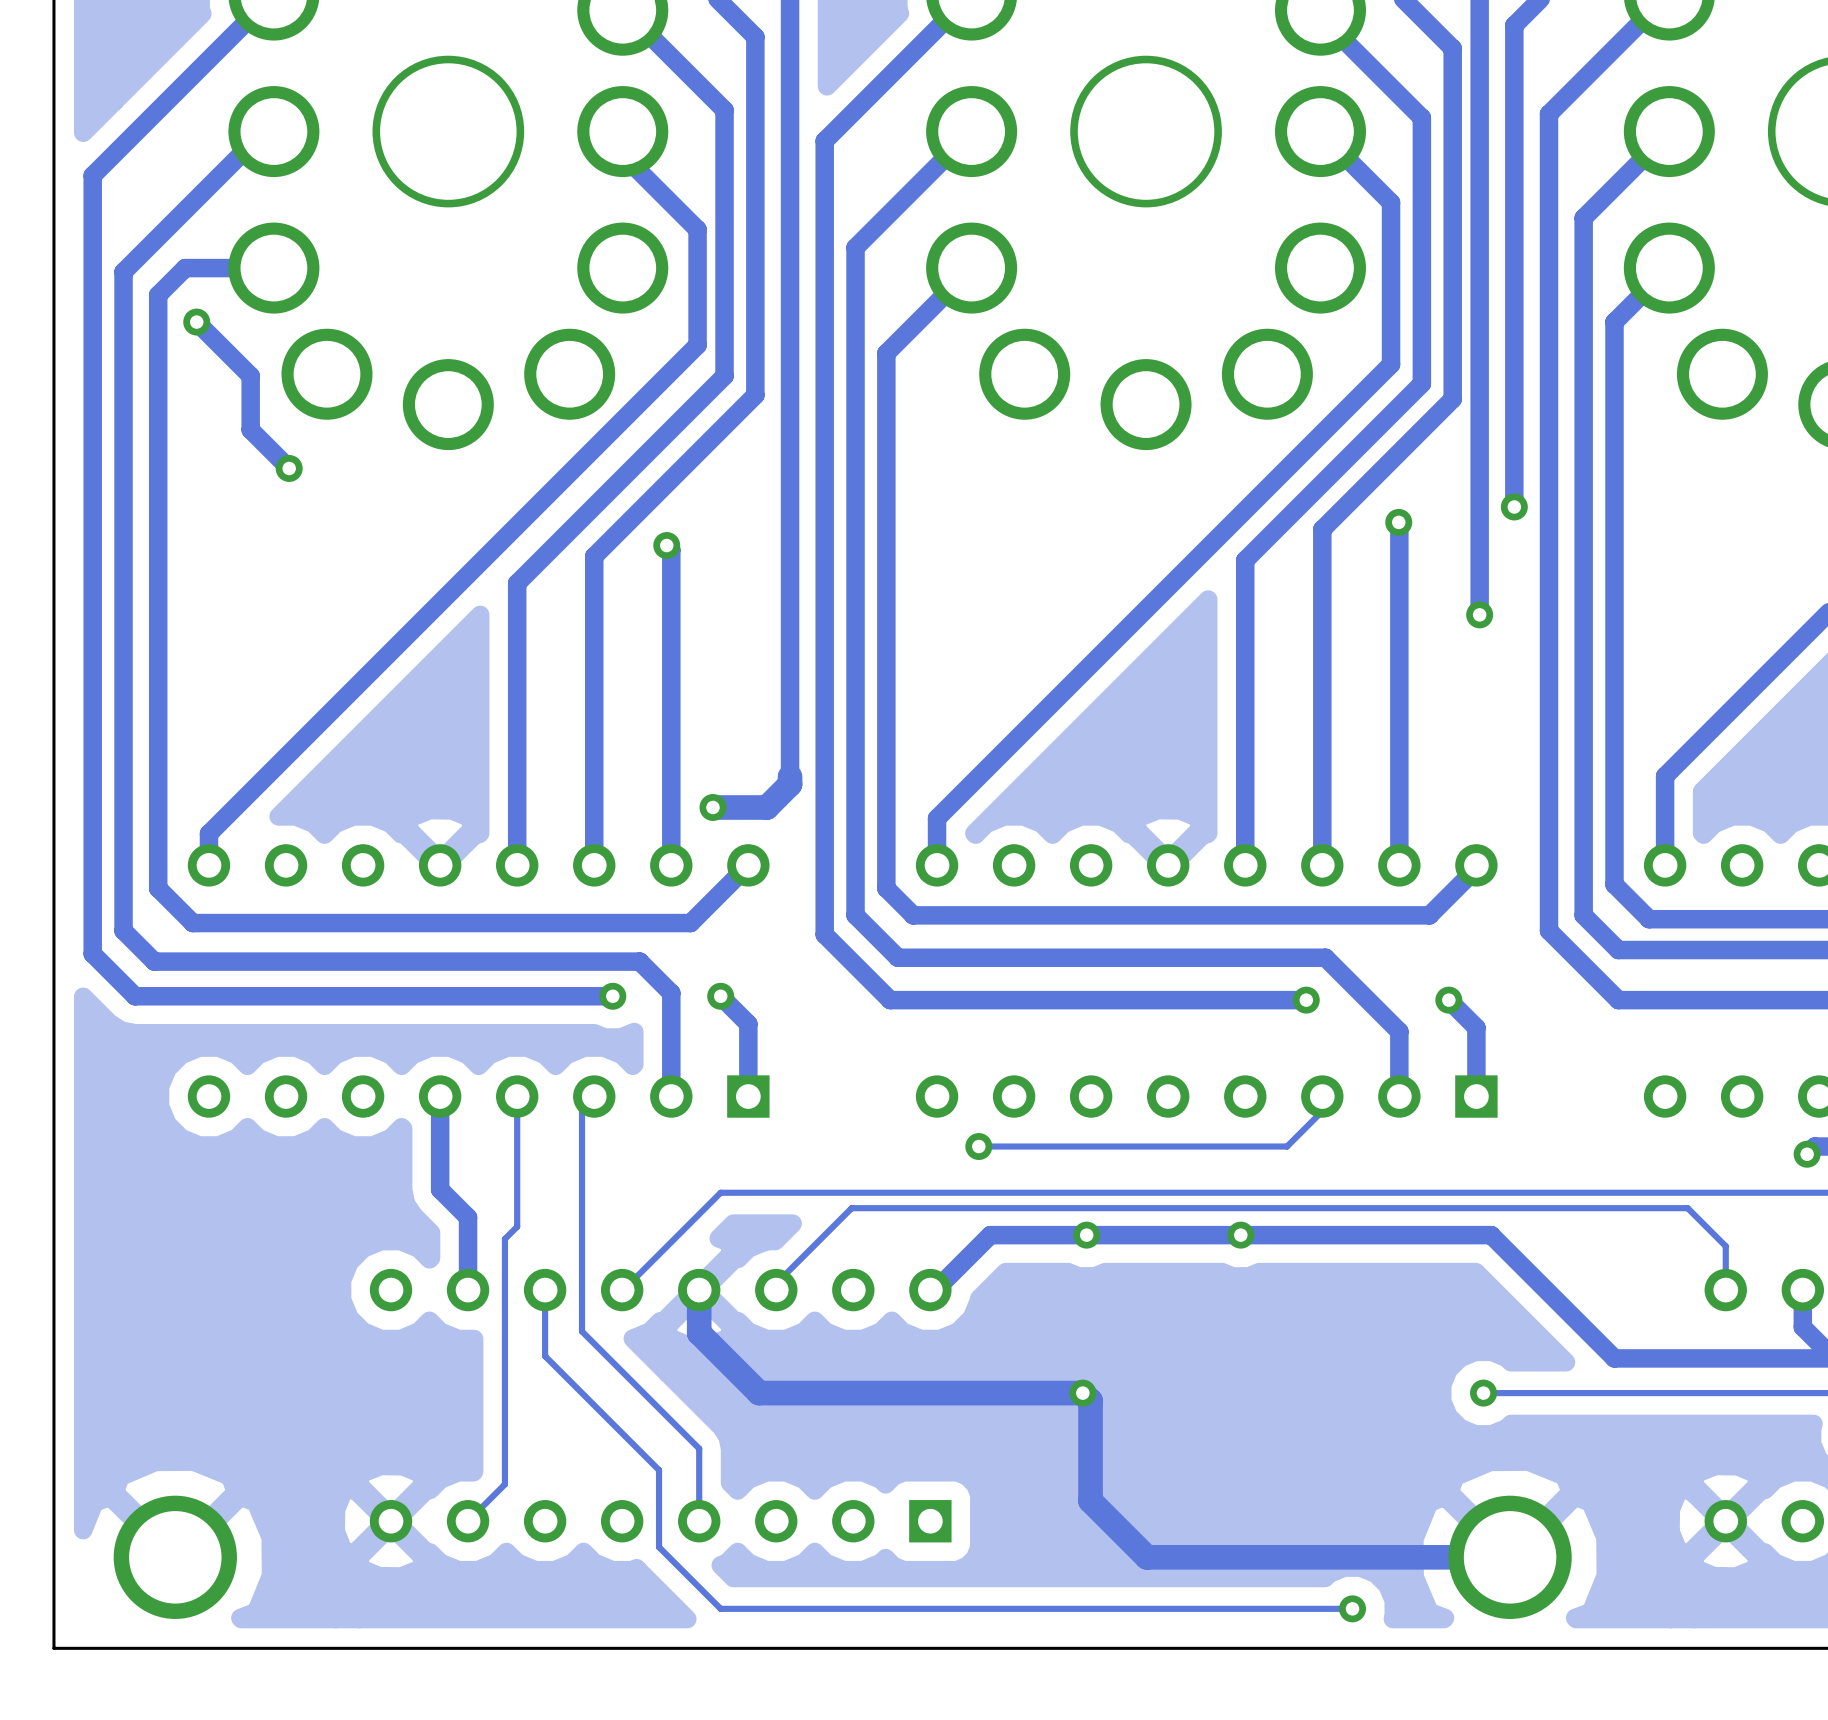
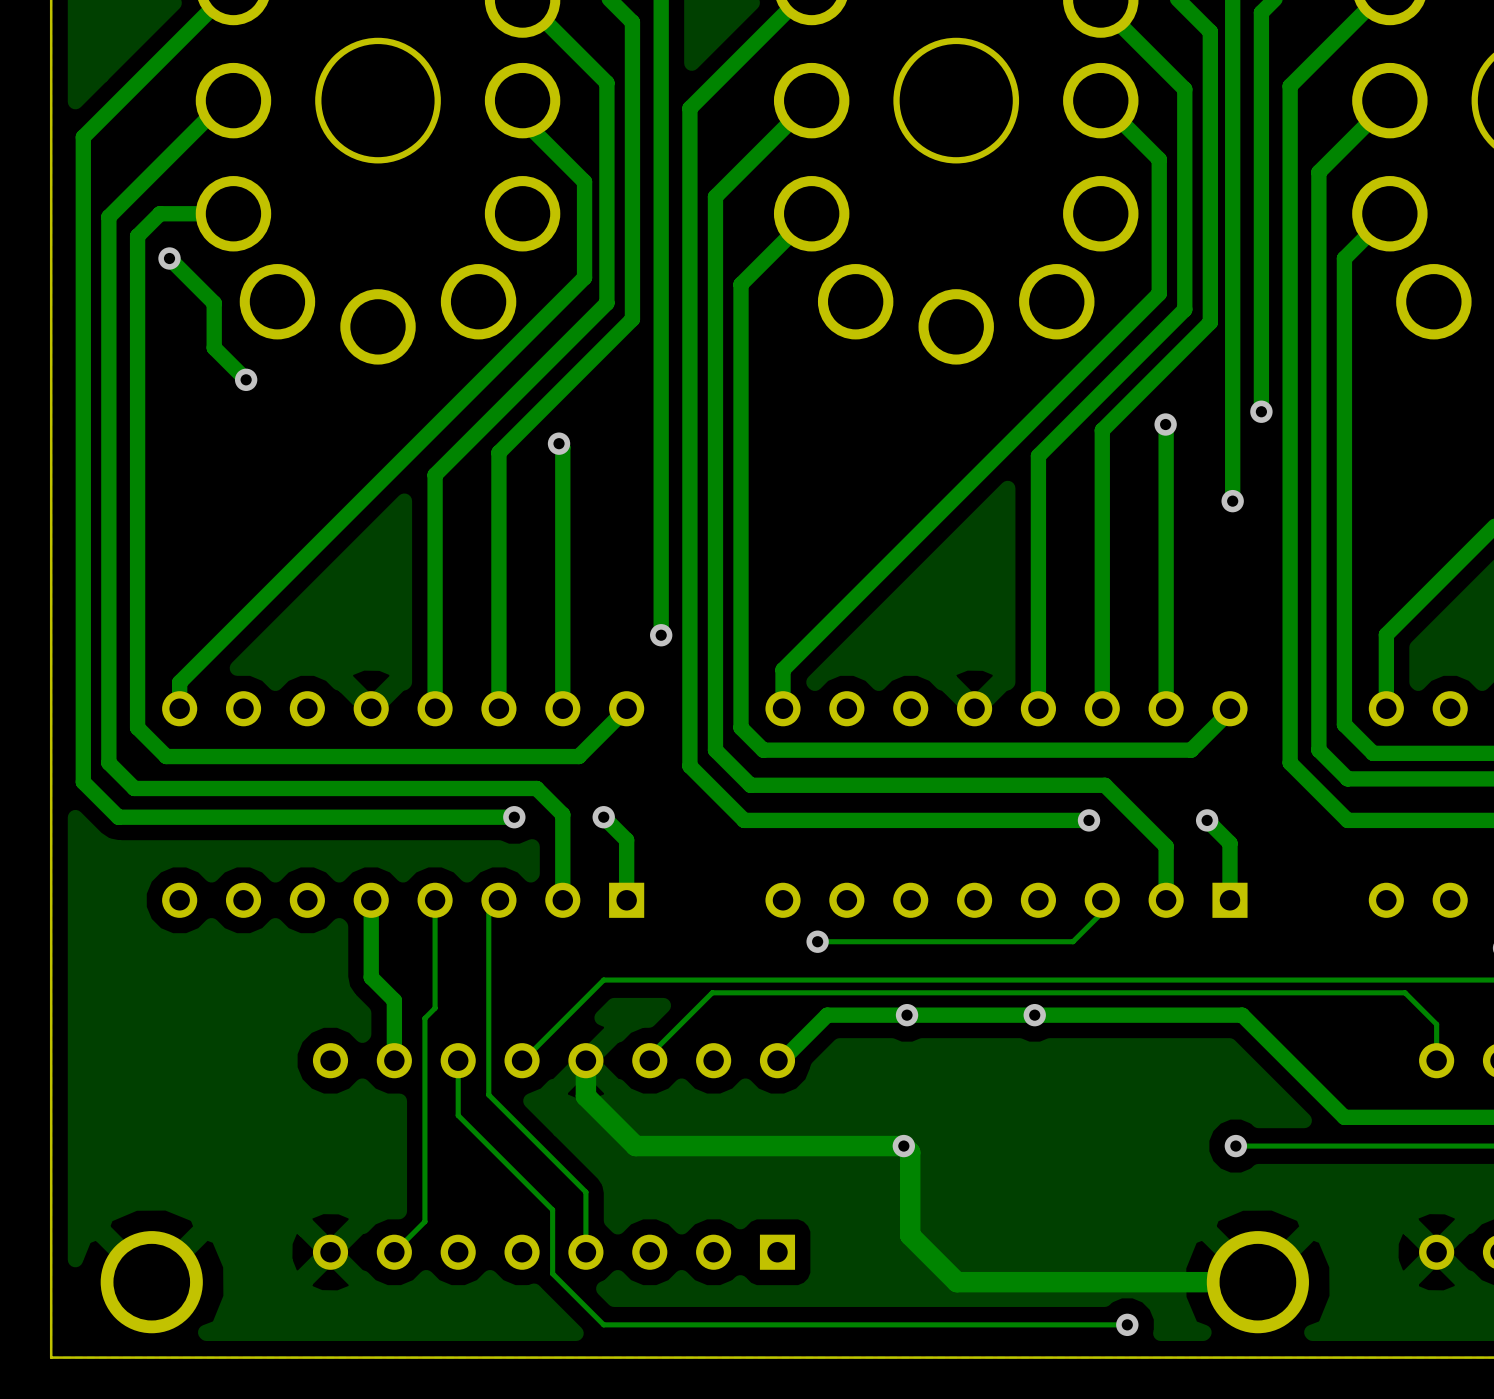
track: (790, 776) (790, 784) (766, 807) (712, 807) -> none
via position: (712, 807) -> (661, 635)

